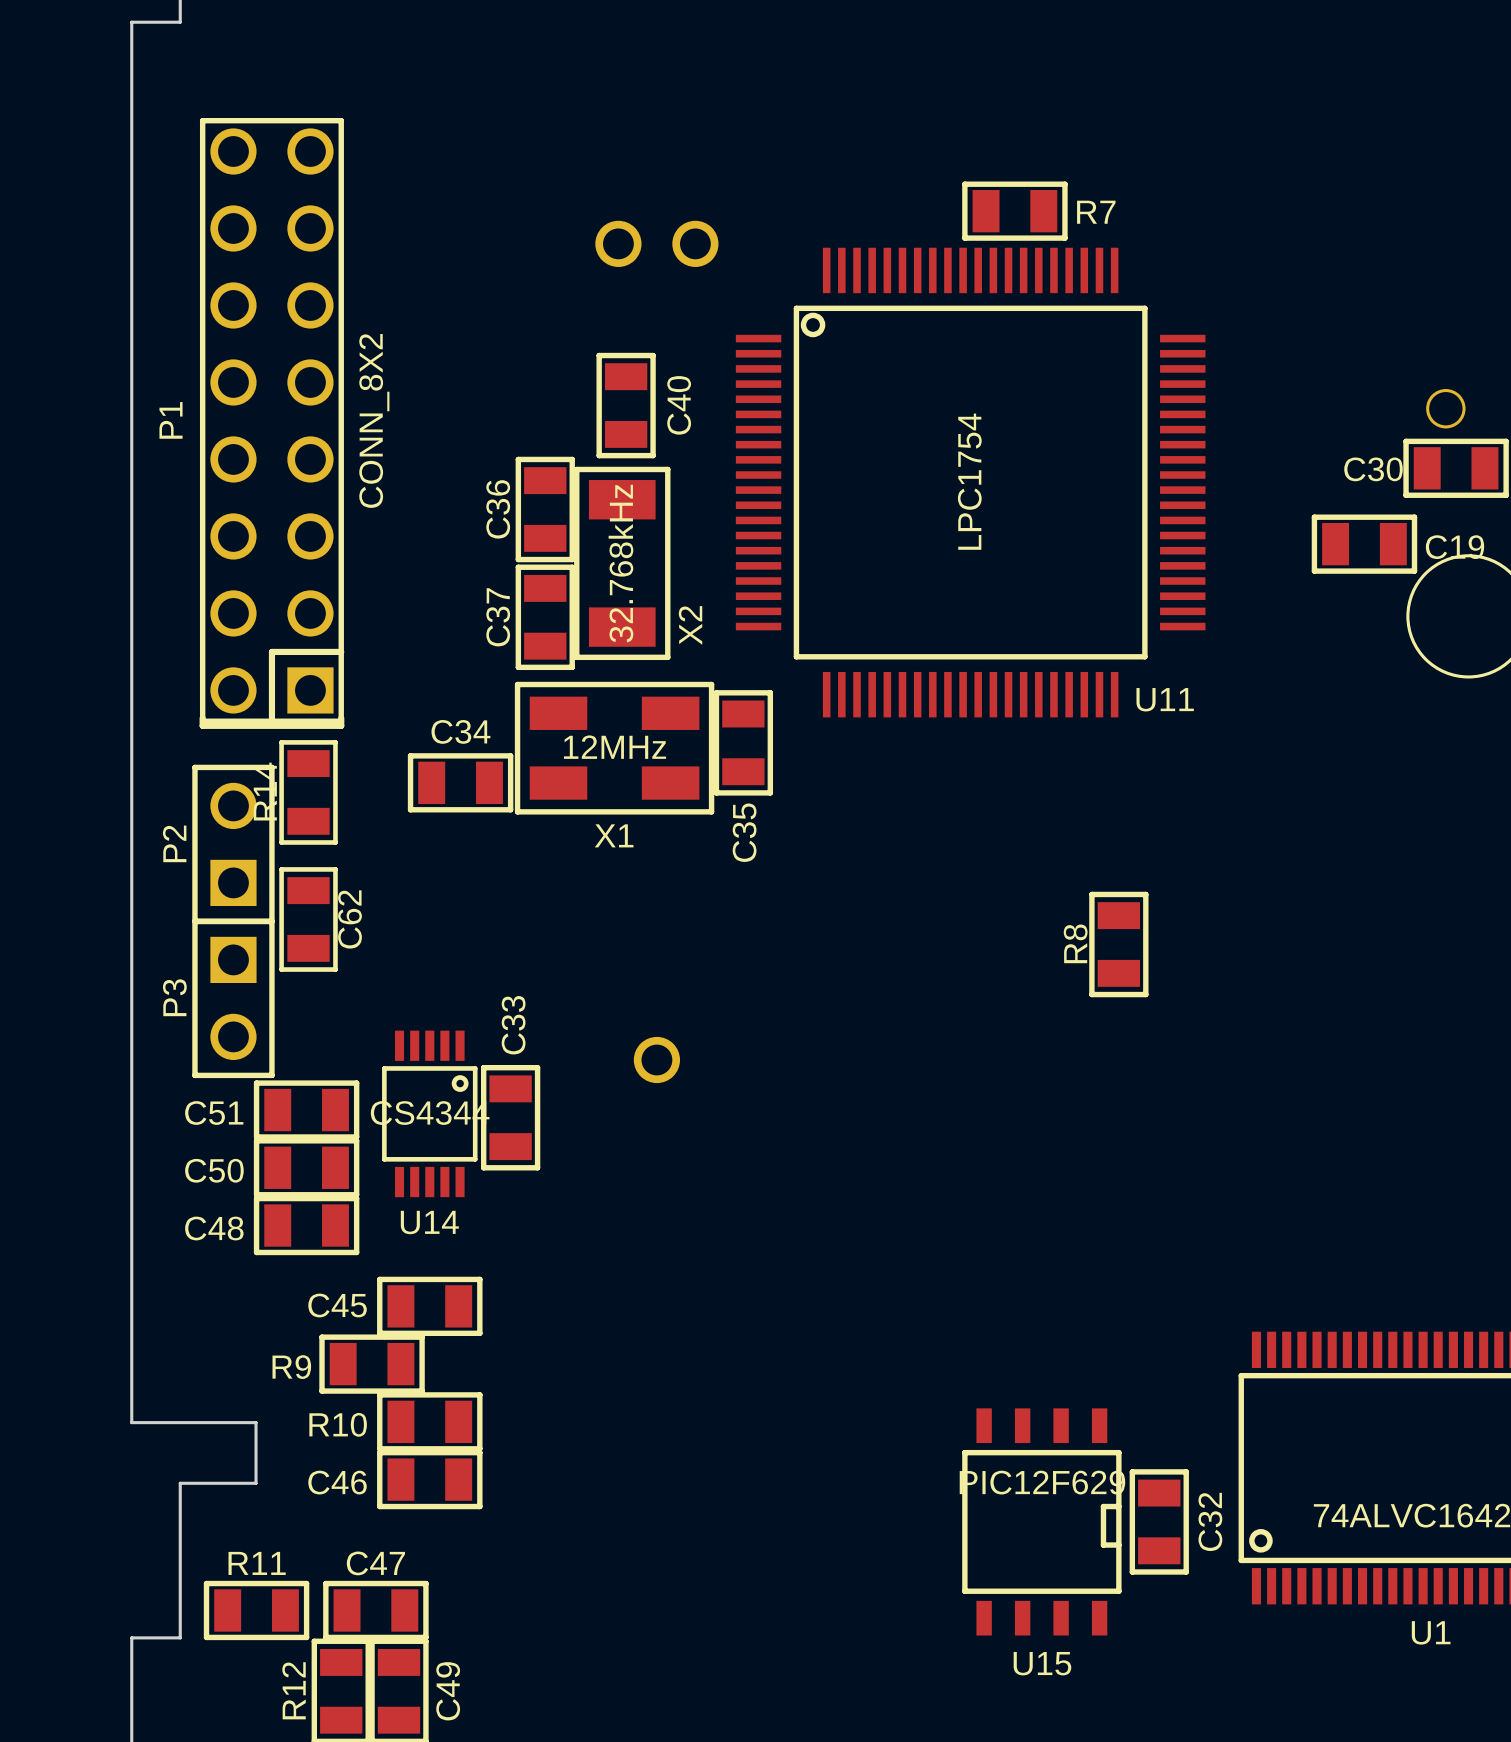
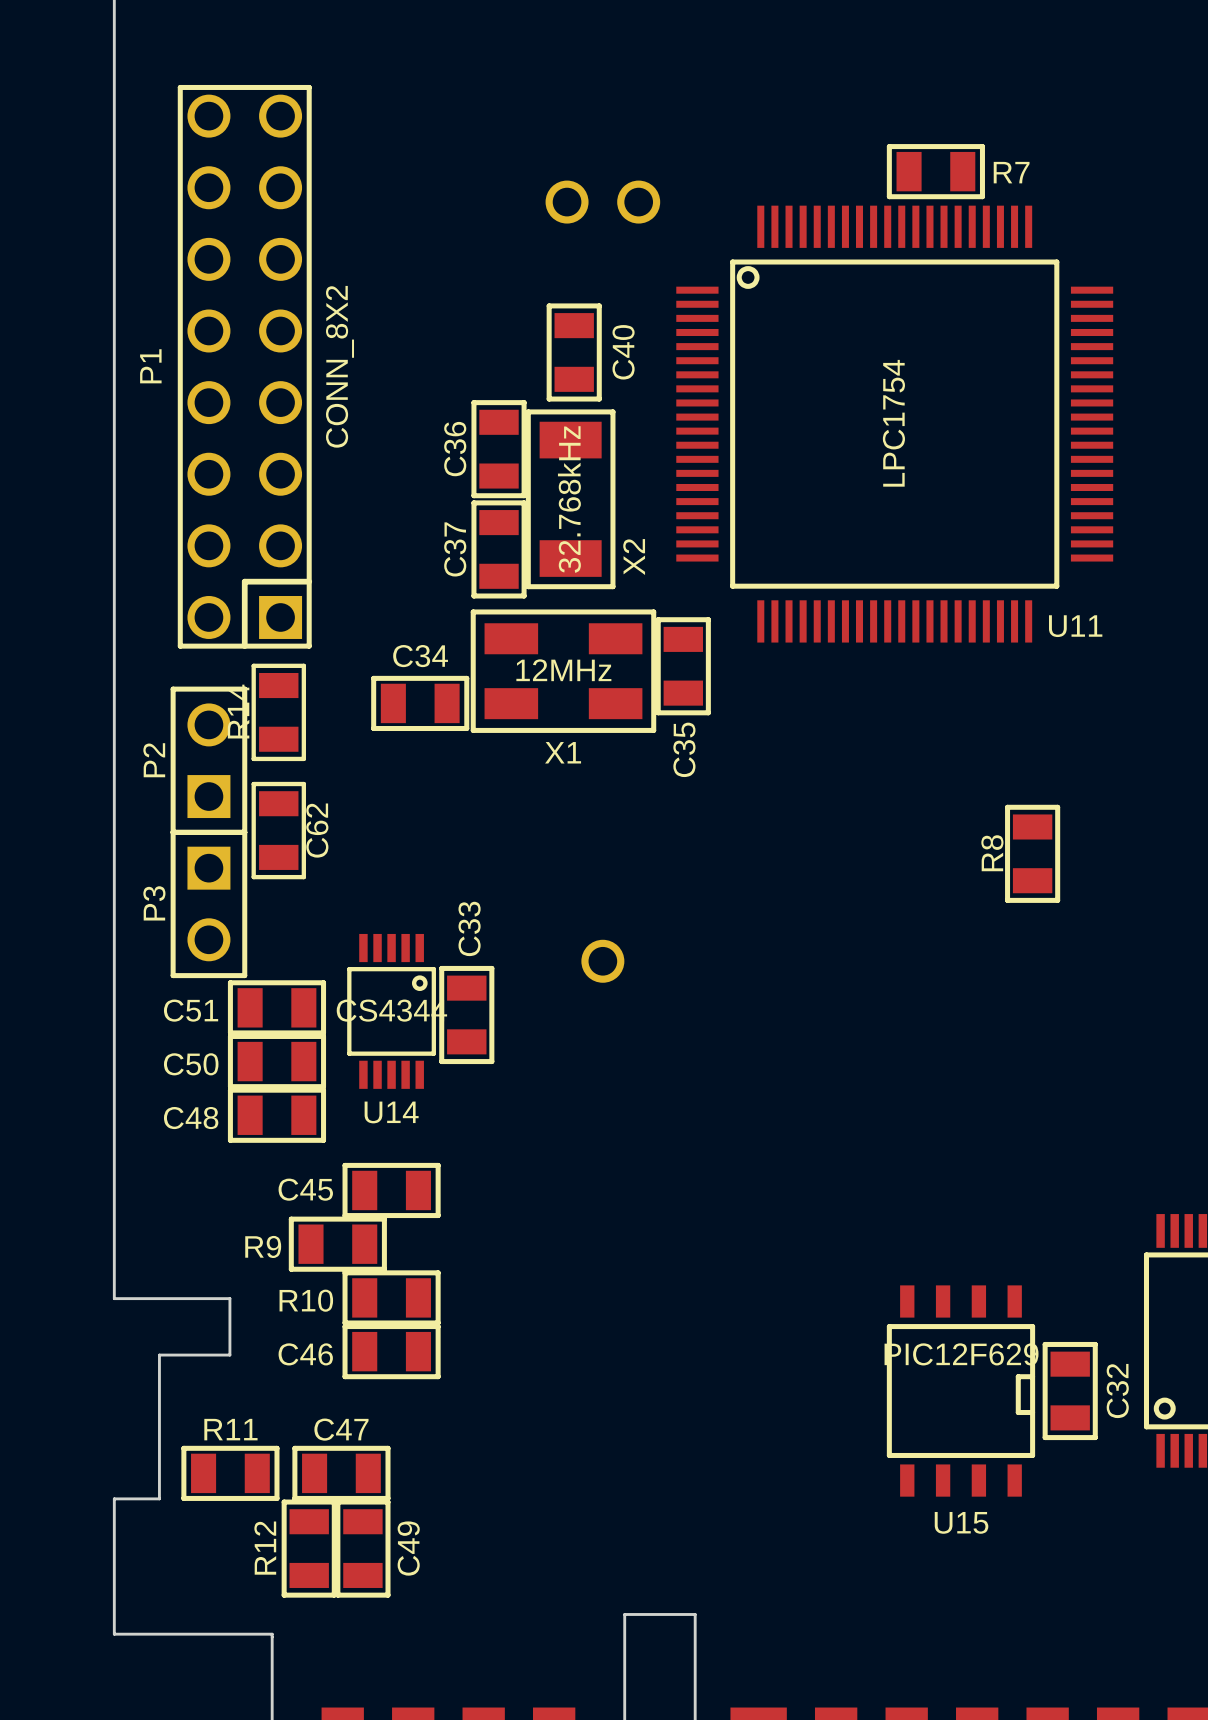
line: (202, 718) (202, 725) (341, 725) (341, 718) -> none

